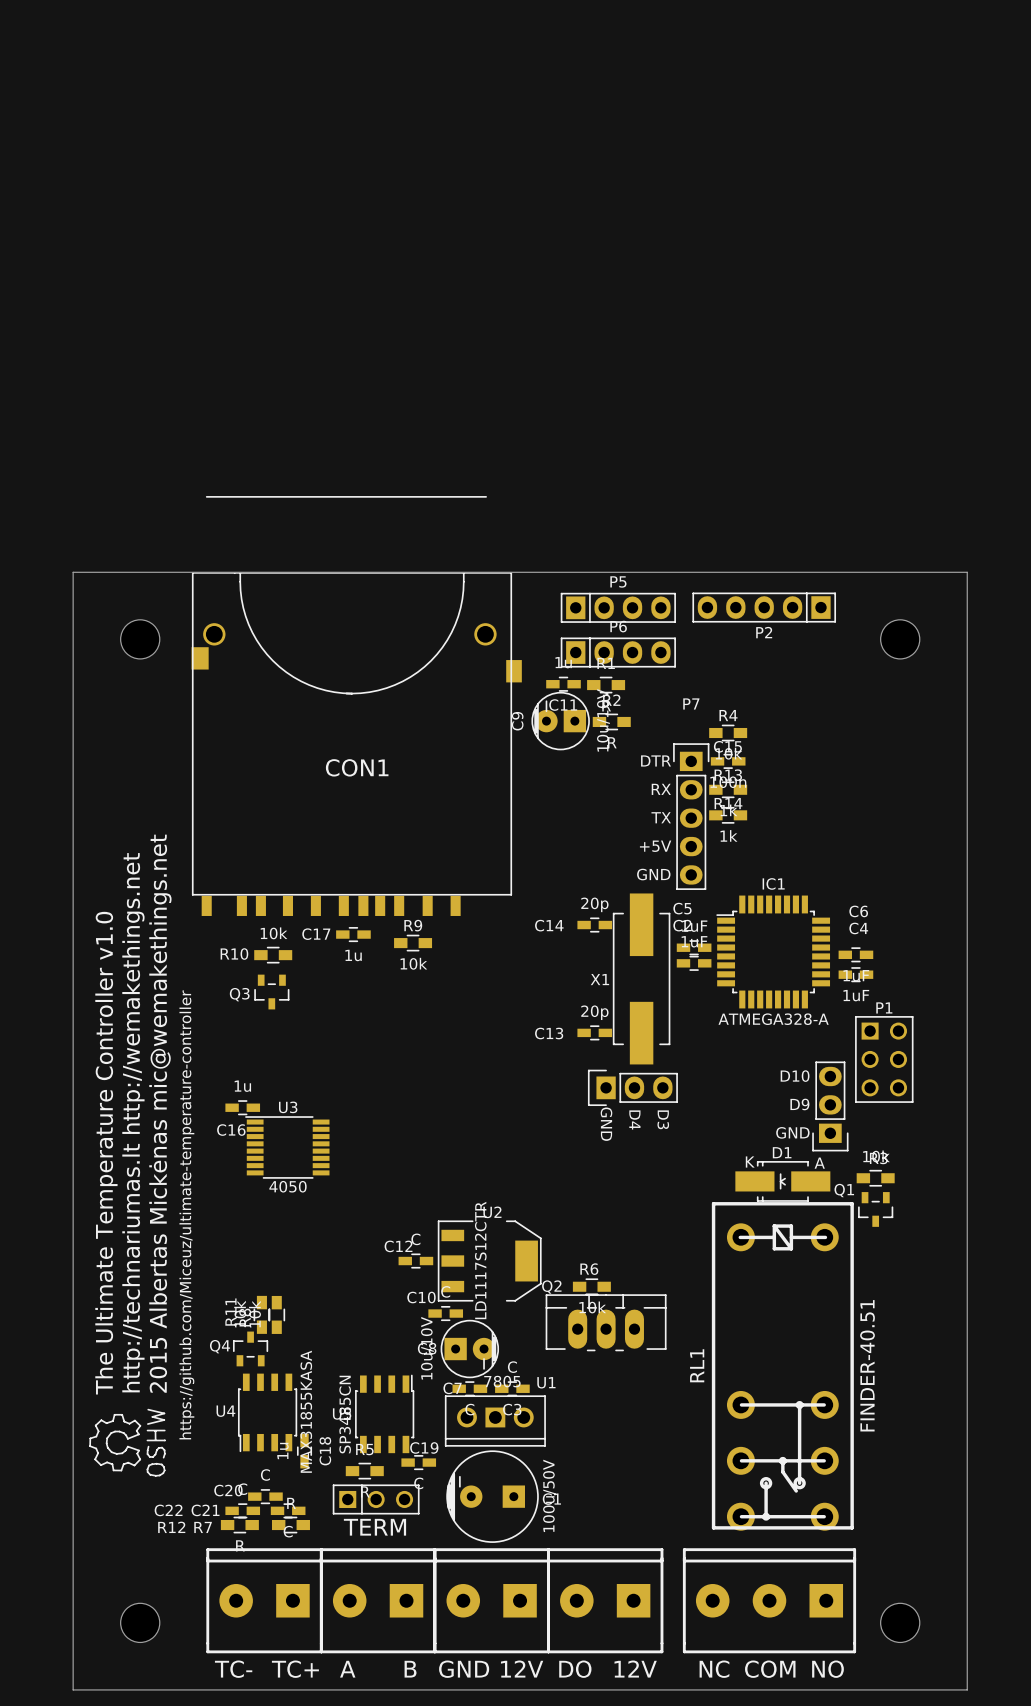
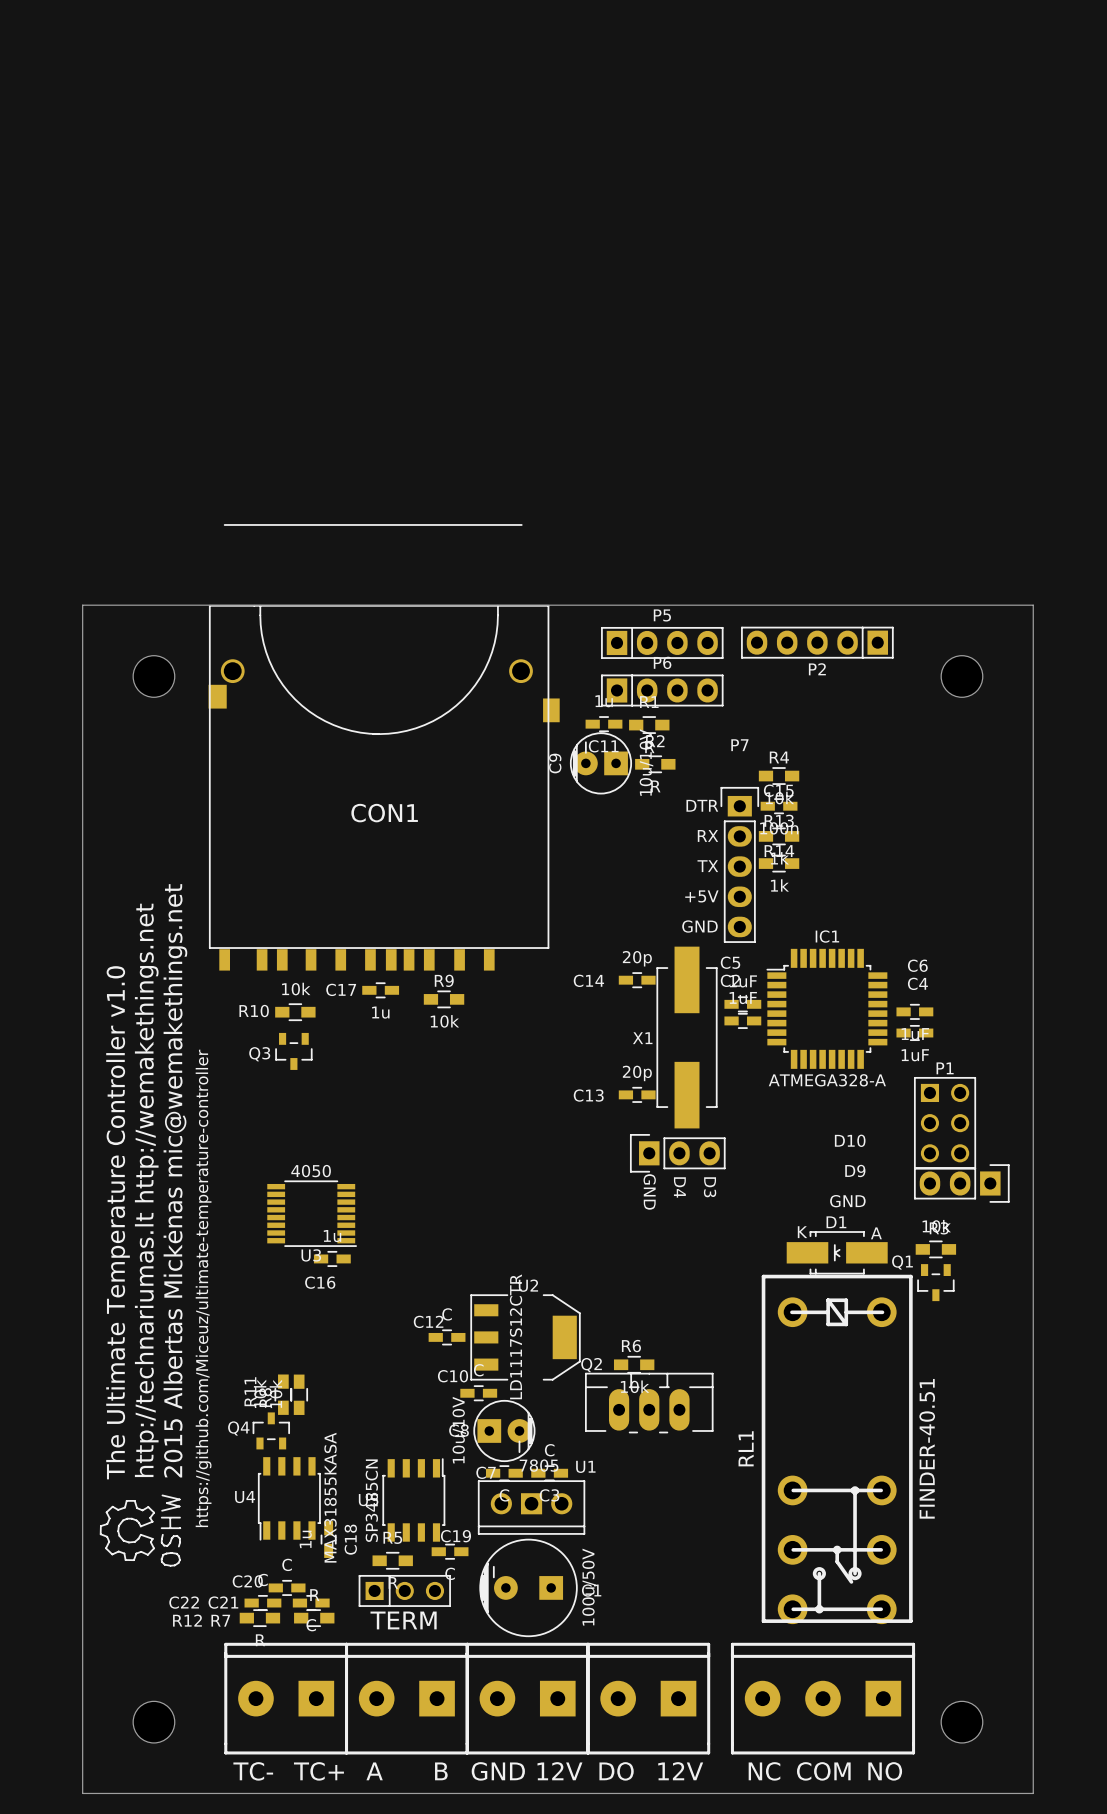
part rotation: 0° (830, 1106) -> 90° counterclockwise (961, 1183)
part position: (830, 1106) -> (961, 1183)
C16 position: (242, 1107) -> (332, 1258)
U3 rotation: 0° (287, 1147) -> 180° (312, 1213)

